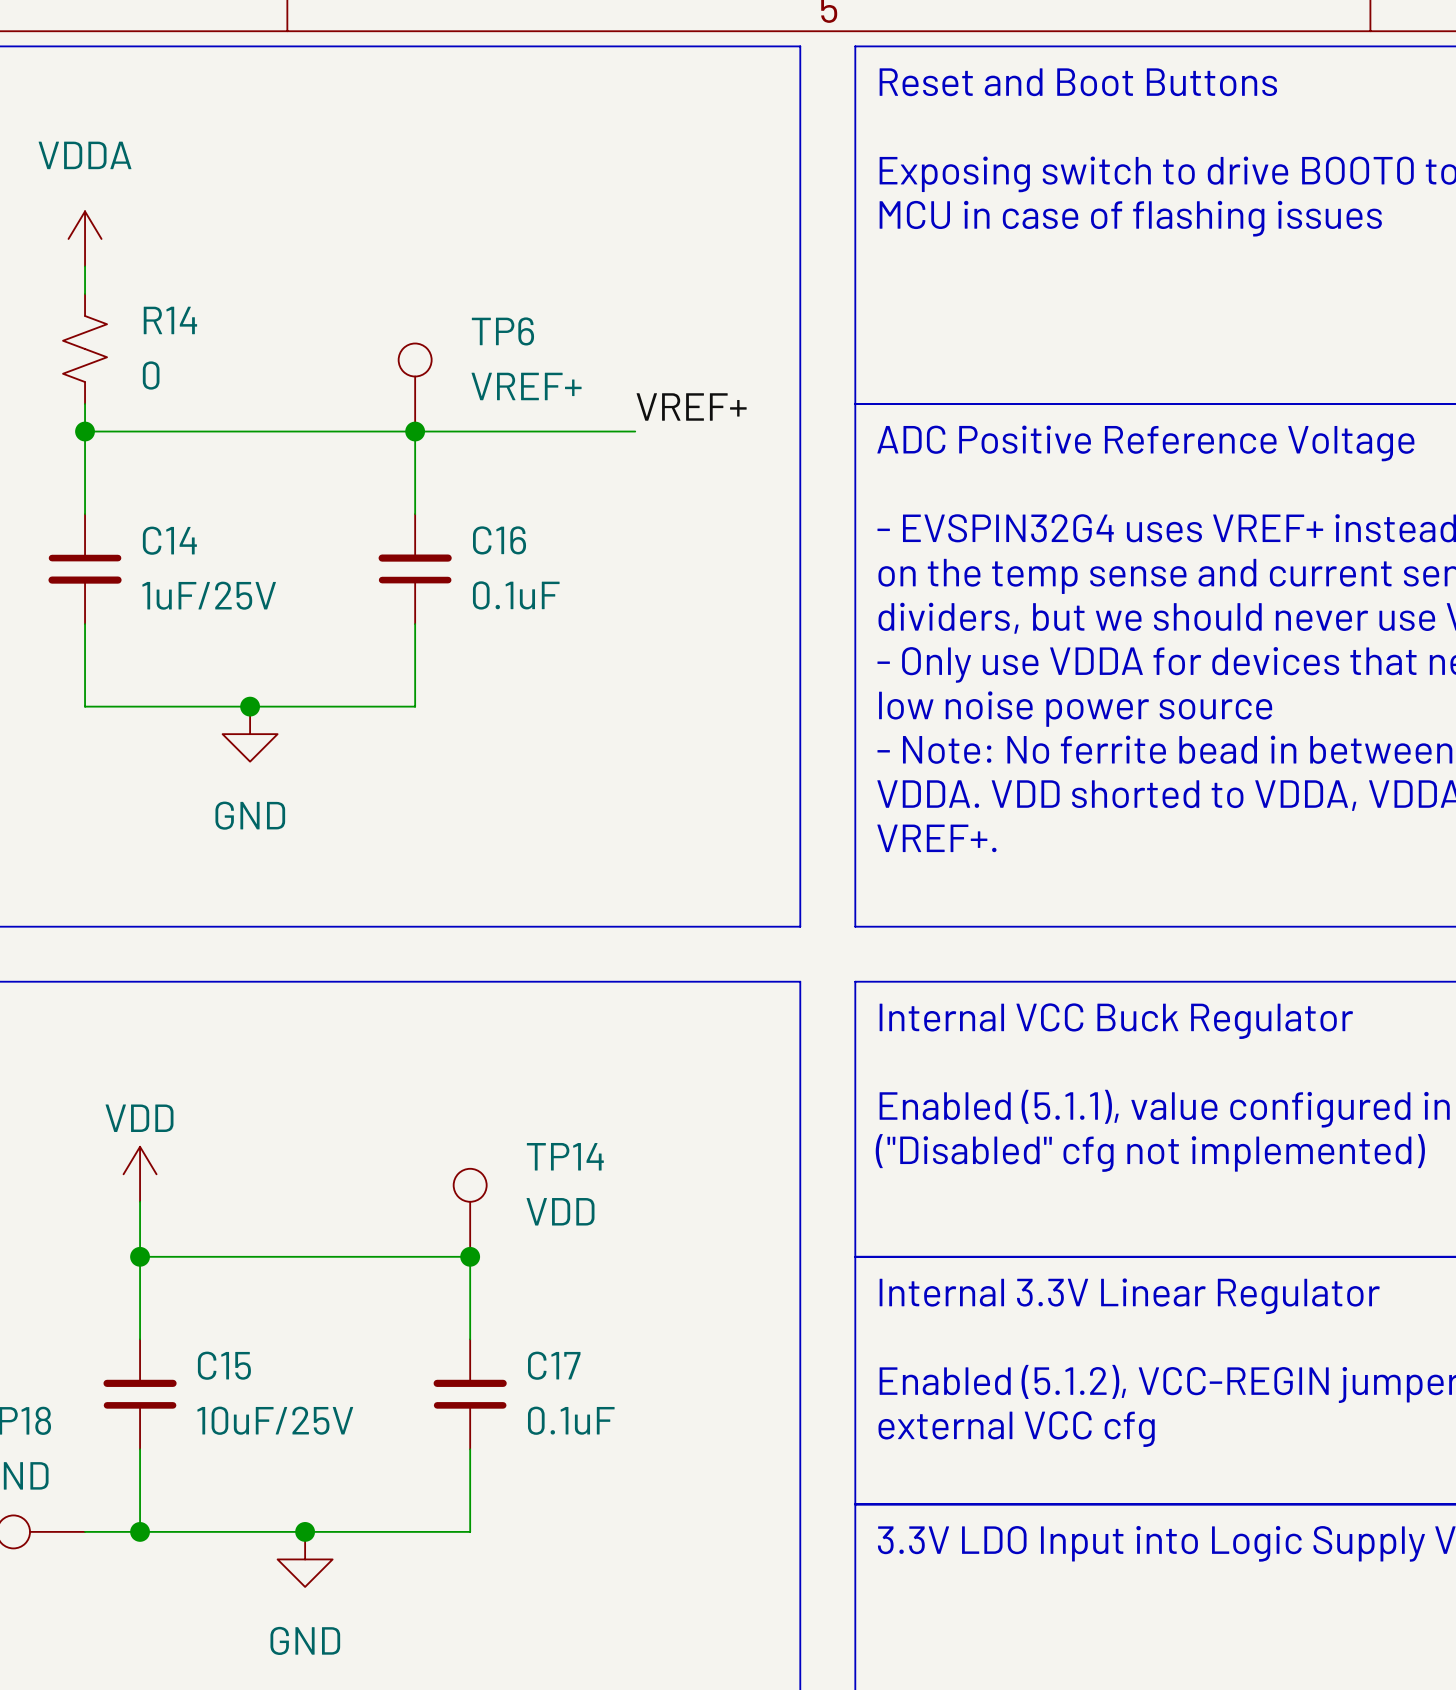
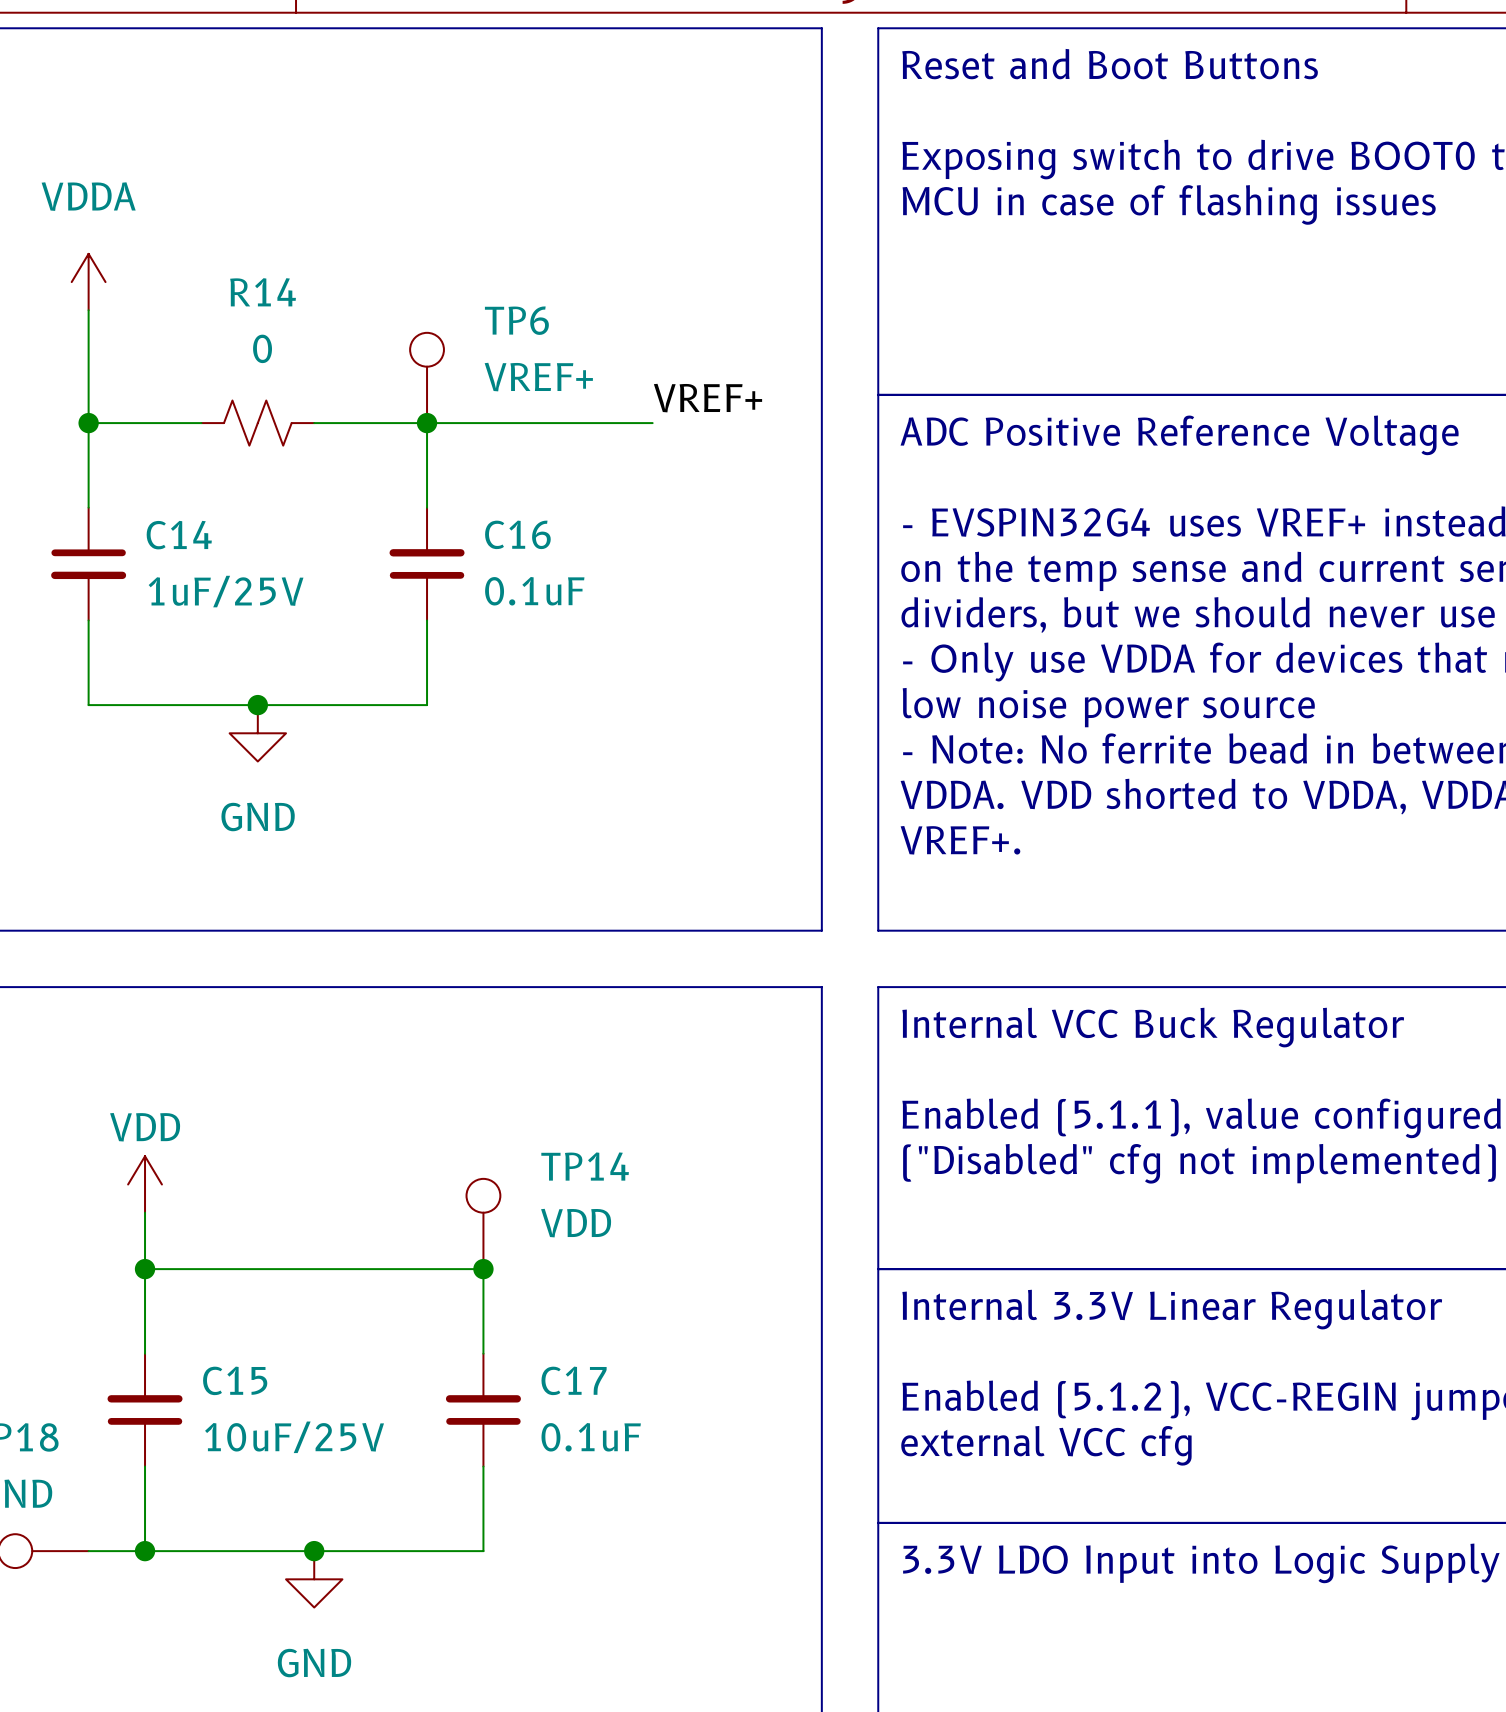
power symbol position: VDDA (85, 238) -> VDDA (88, 282)
R14 name position: R14 (170, 320) -> R14 (263, 292)
wire: none -> (88, 310) (88, 394)
R14 rotation: 0° (85, 349) -> 90° clockwise (257, 423)
R14 position: (85, 349) -> (257, 423)
R14 value position: 0 (151, 375) -> 0 (262, 348)
wire: (195, 431) (305, 431) -> none

